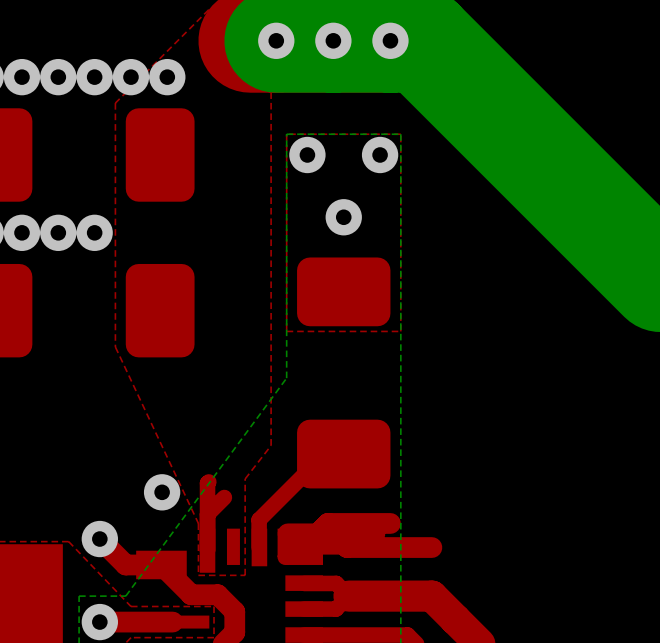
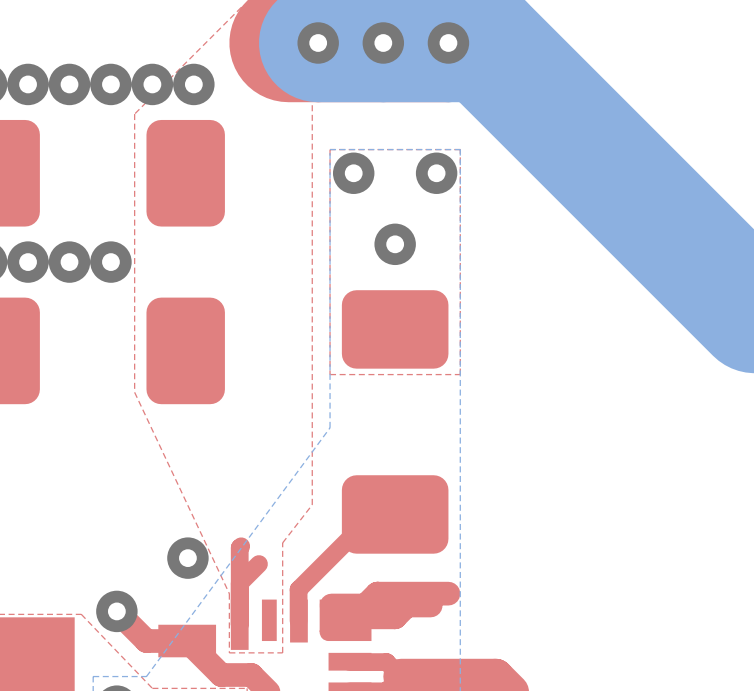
top track: (343, 544) (347, 547) (431, 547) -> none

